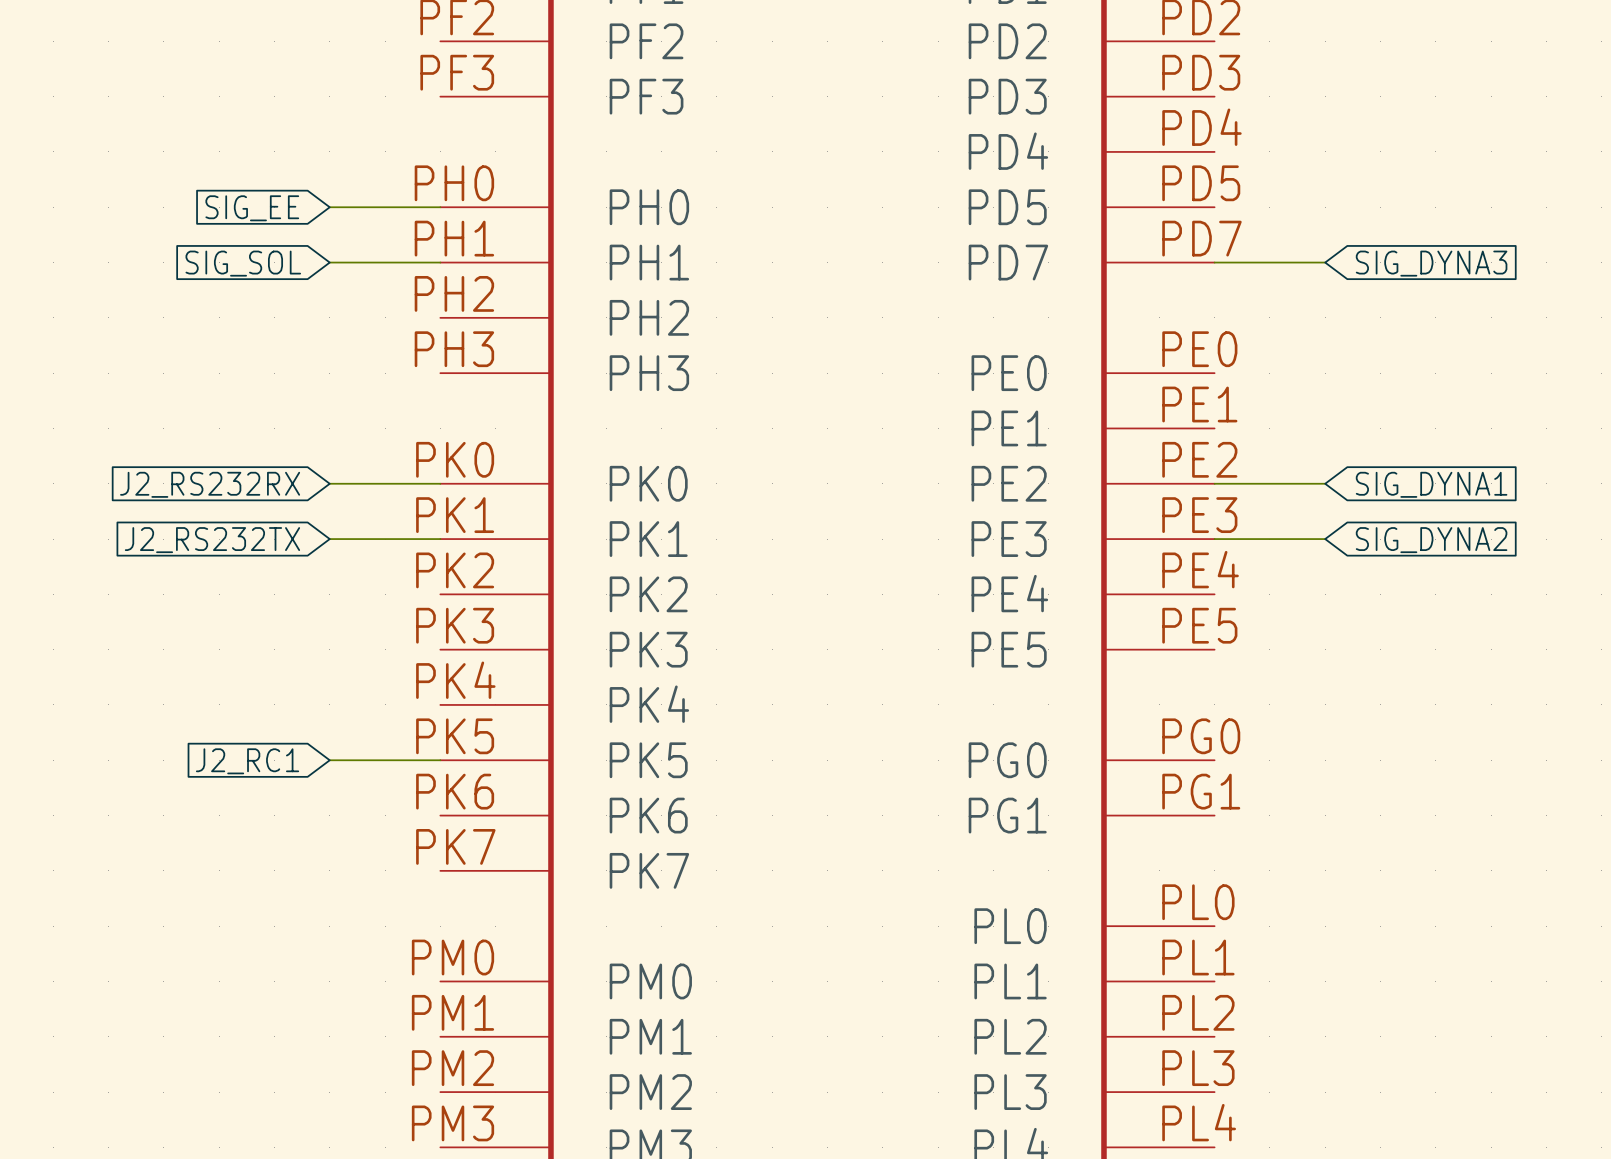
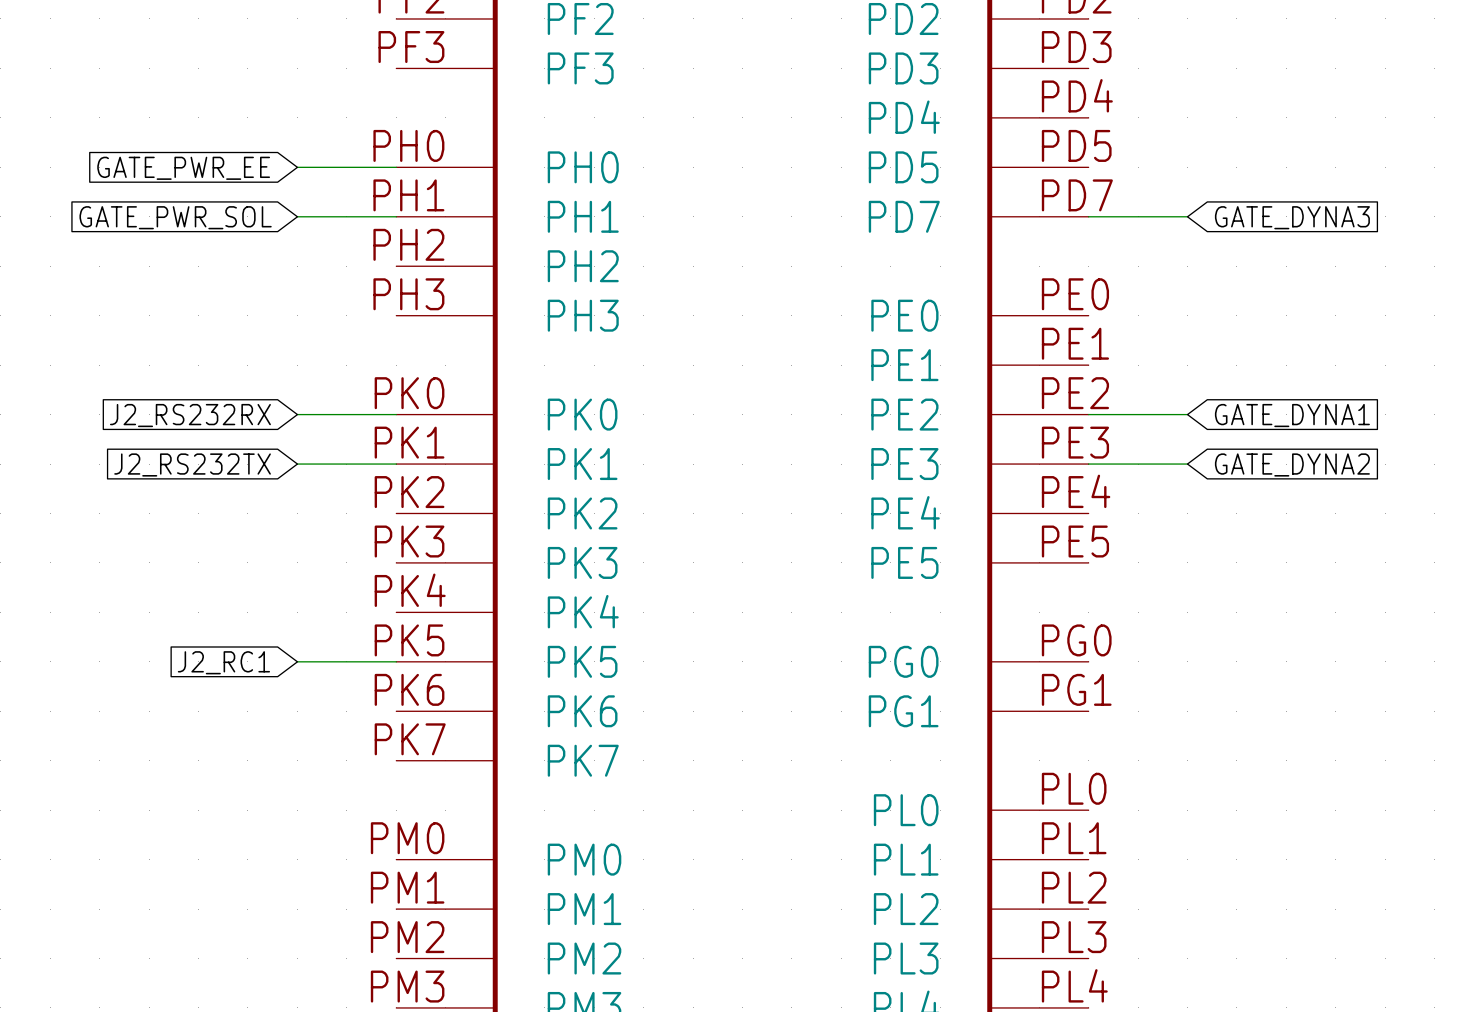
global label: SIG_EE (252, 208) -> GATE_PWR_EE (183, 168)
global label: SIG_SOL (243, 263) -> GATE_PWR_SOL (175, 217)
global label: SIG_DYNA3 (1431, 263) -> GATE_DYNA3 (1292, 217)
global label: SIG_DYNA1 (1431, 484) -> GATE_DYNA1 (1292, 415)
global label: SIG_DYNA2 (1431, 540) -> GATE_DYNA2 (1292, 464)

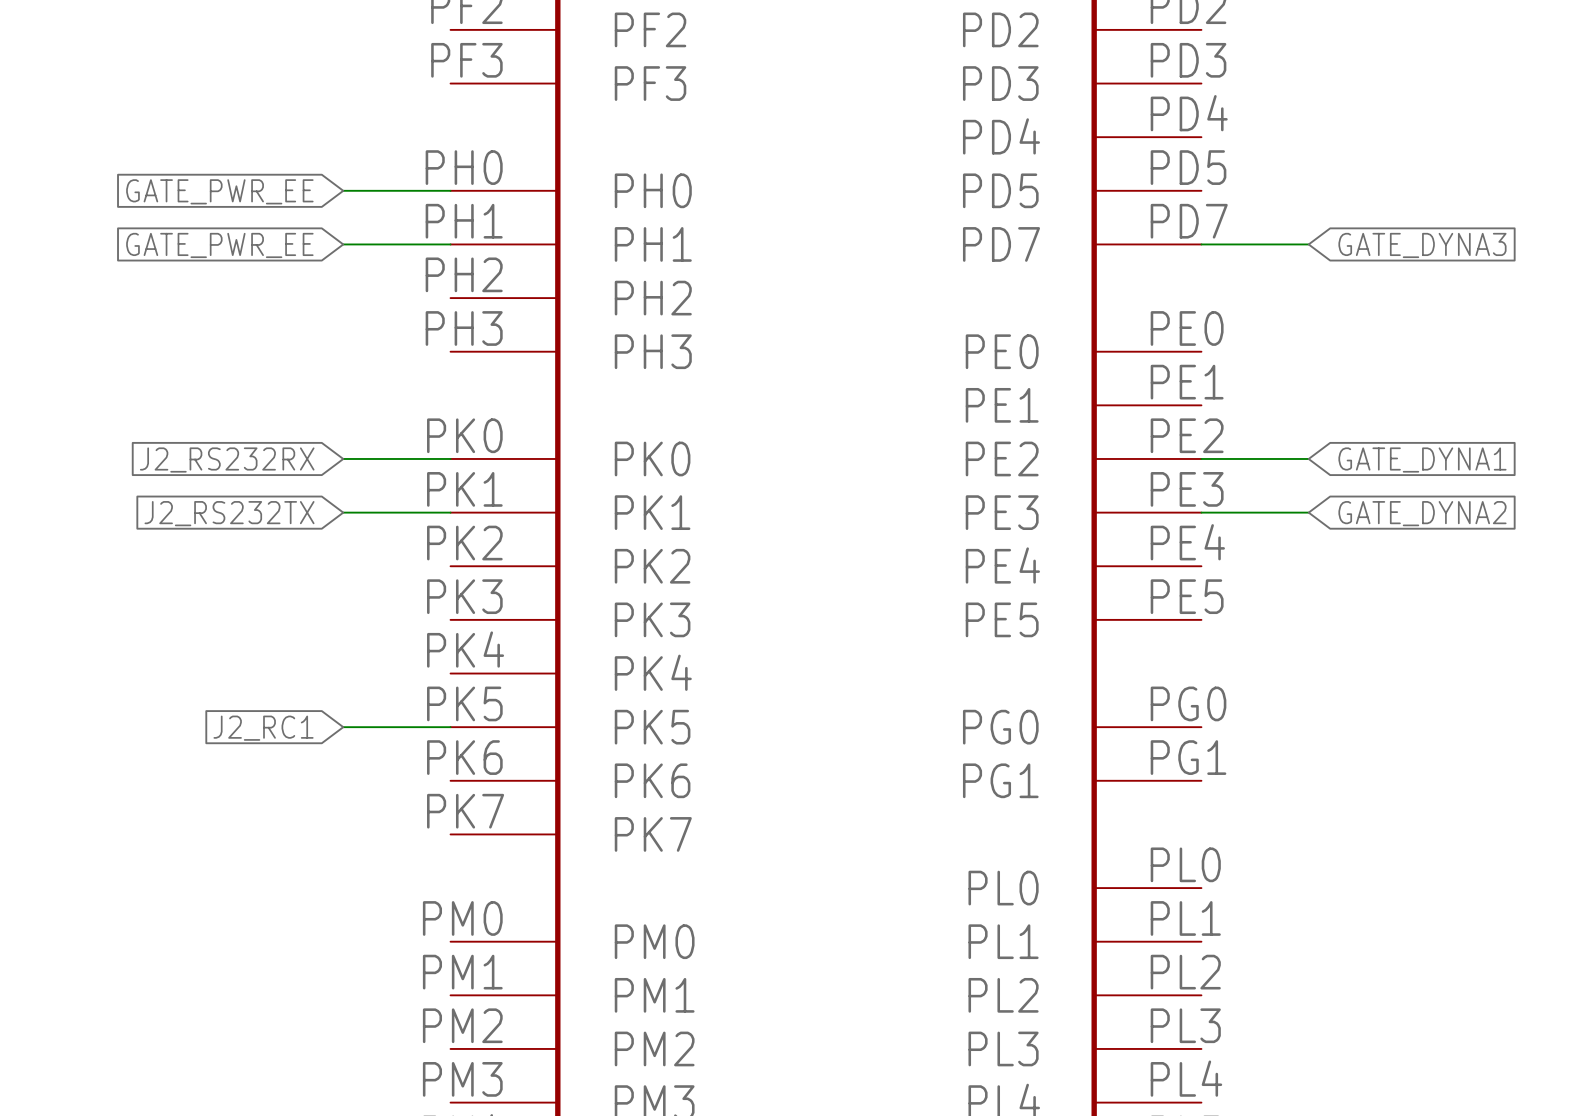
global label: GATE_PWR_SOL (175, 217) -> GATE_PWR_EE (219, 245)

